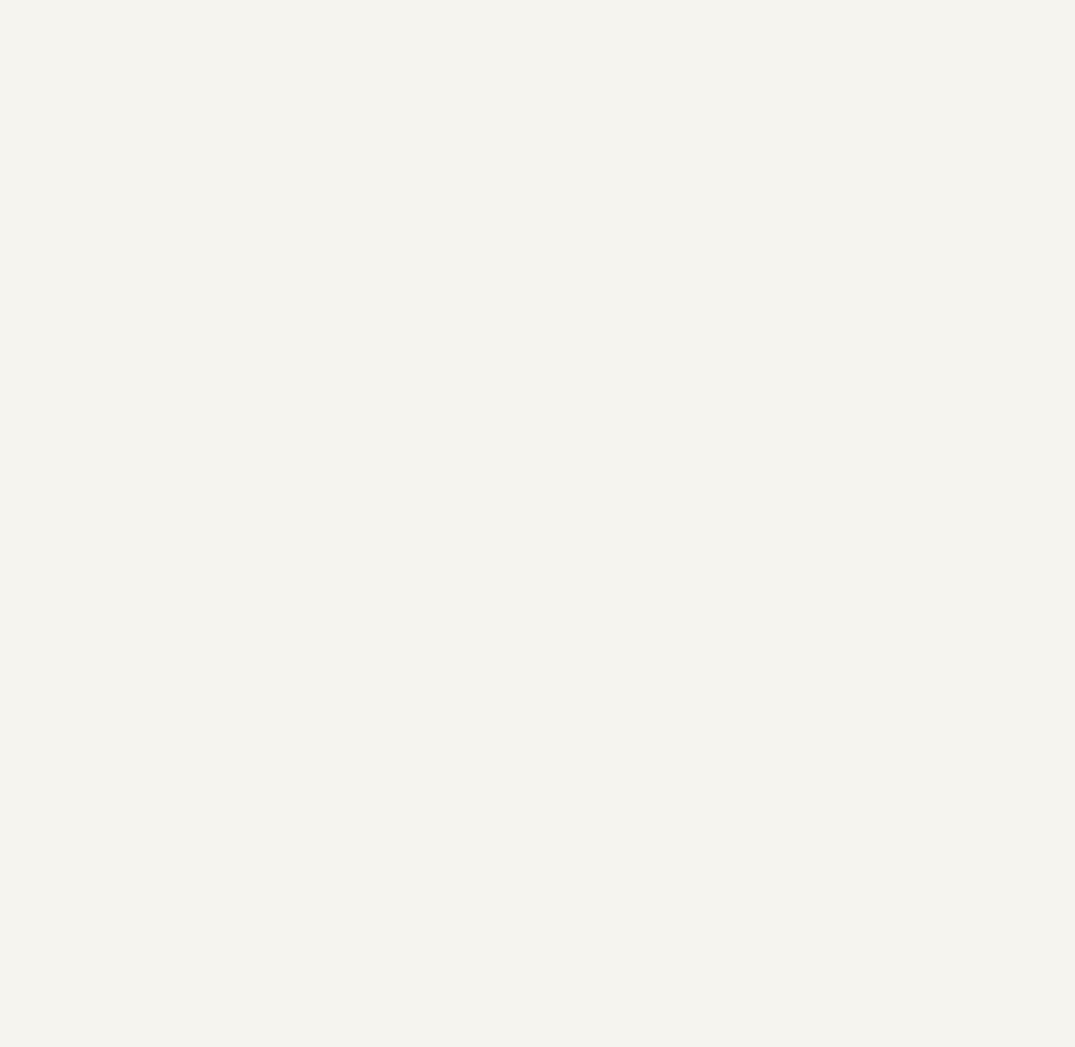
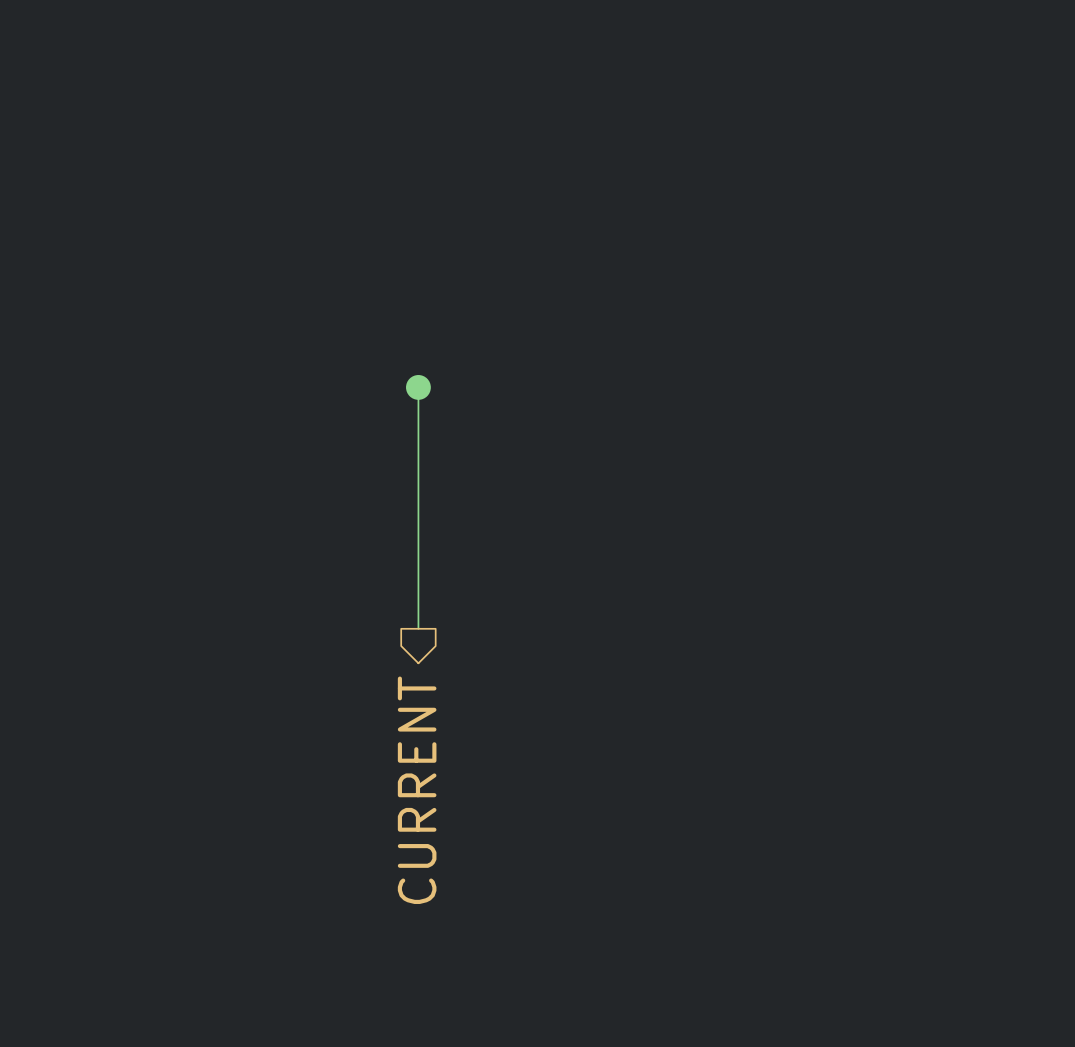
wire: none -> (418, 387) (418, 628)
junction: none -> (418, 387)
hierarchical label: none -> CURRENT (417, 790)

